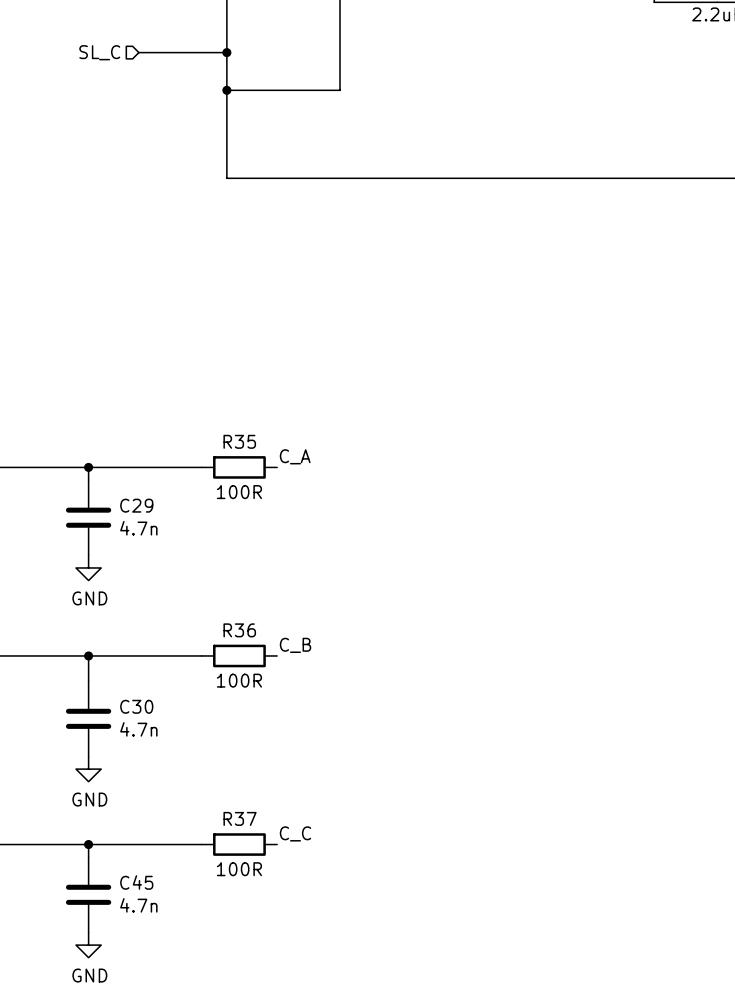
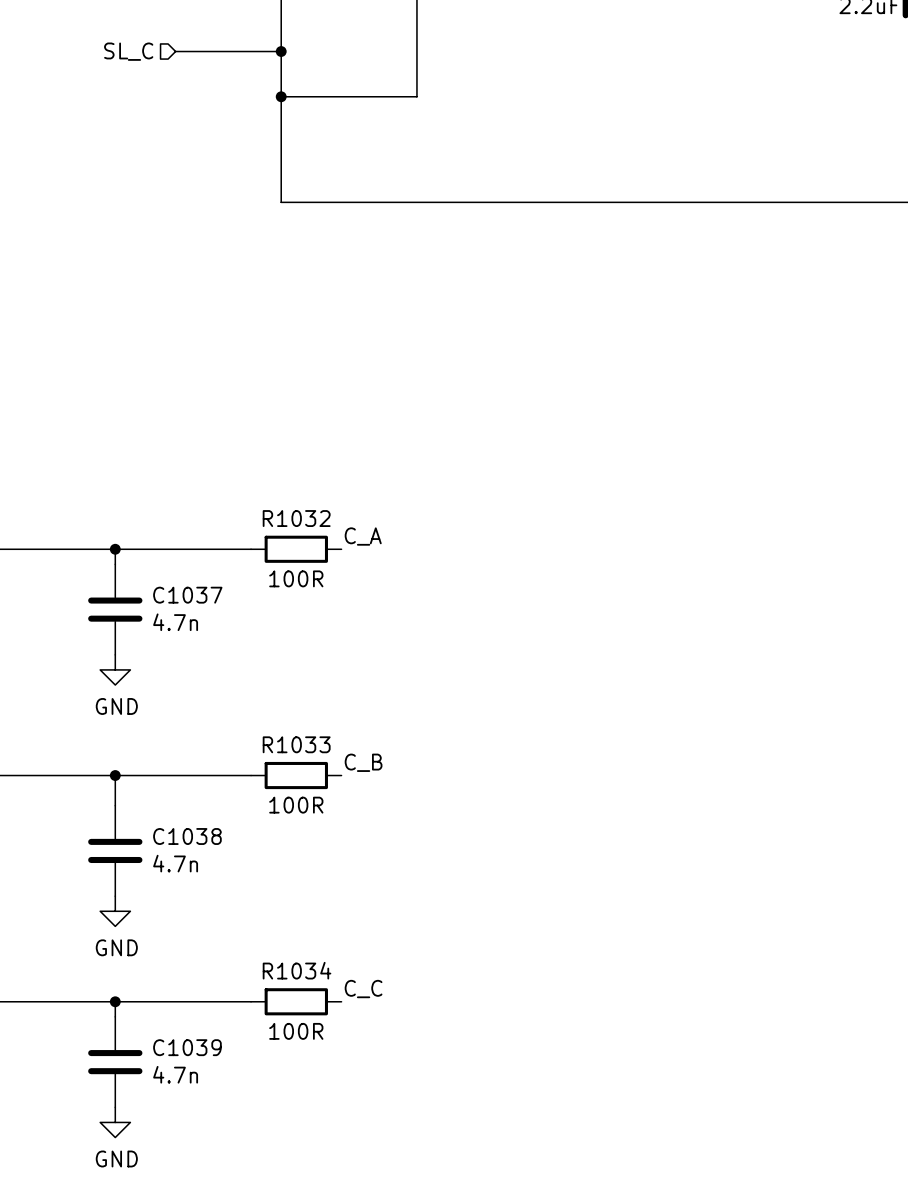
R35 name: R35 (239, 441) -> R1032 (296, 518)
C29 name: C29 (136, 505) -> C1037 (187, 595)
R36 name: R36 (239, 630) -> R1033 (296, 744)
C30 name: C30 (136, 706) -> C1038 (187, 836)
R37 name: R37 (240, 818) -> R1034 (297, 970)
C45 name: C45 (136, 882) -> C1039 (187, 1047)

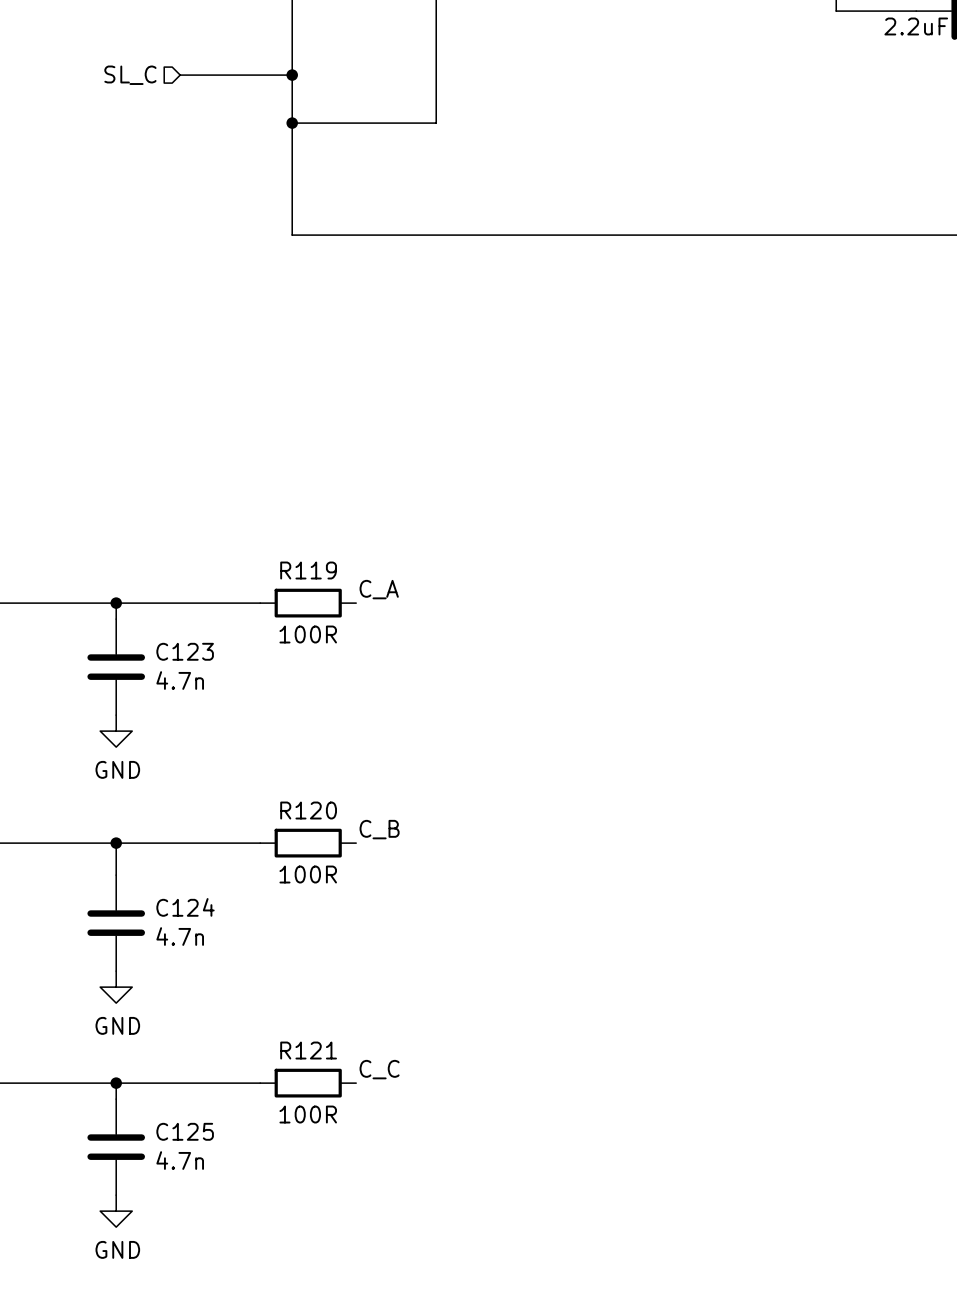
R1032 name: R1032 (296, 518) -> R119 (308, 570)
C1037 name: C1037 (187, 595) -> C123 (185, 651)
R1033 name: R1033 (296, 744) -> R120 (308, 810)
C1038 name: C1038 (187, 836) -> C124 (185, 907)
R1034 name: R1034 (297, 970) -> R121 (308, 1050)
C1039 name: C1039 (187, 1047) -> C125 (185, 1131)

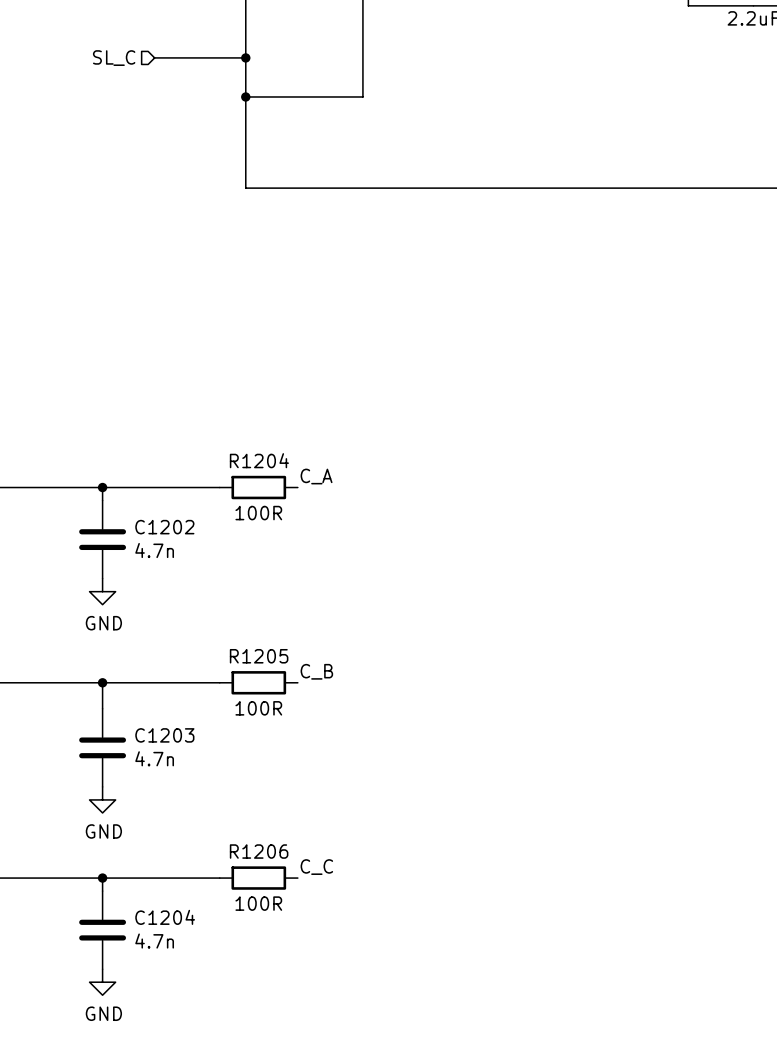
R119 name: R119 (308, 570) -> R1204 (259, 460)
C123 name: C123 (185, 651) -> C1202 (164, 527)
R120 name: R120 (308, 810) -> R1205 (259, 656)
C124 name: C124 (185, 907) -> C1203 (164, 735)
R121 name: R121 (308, 1050) -> R1206 (259, 851)
C125 name: C125 (185, 1131) -> C1204 (165, 917)

